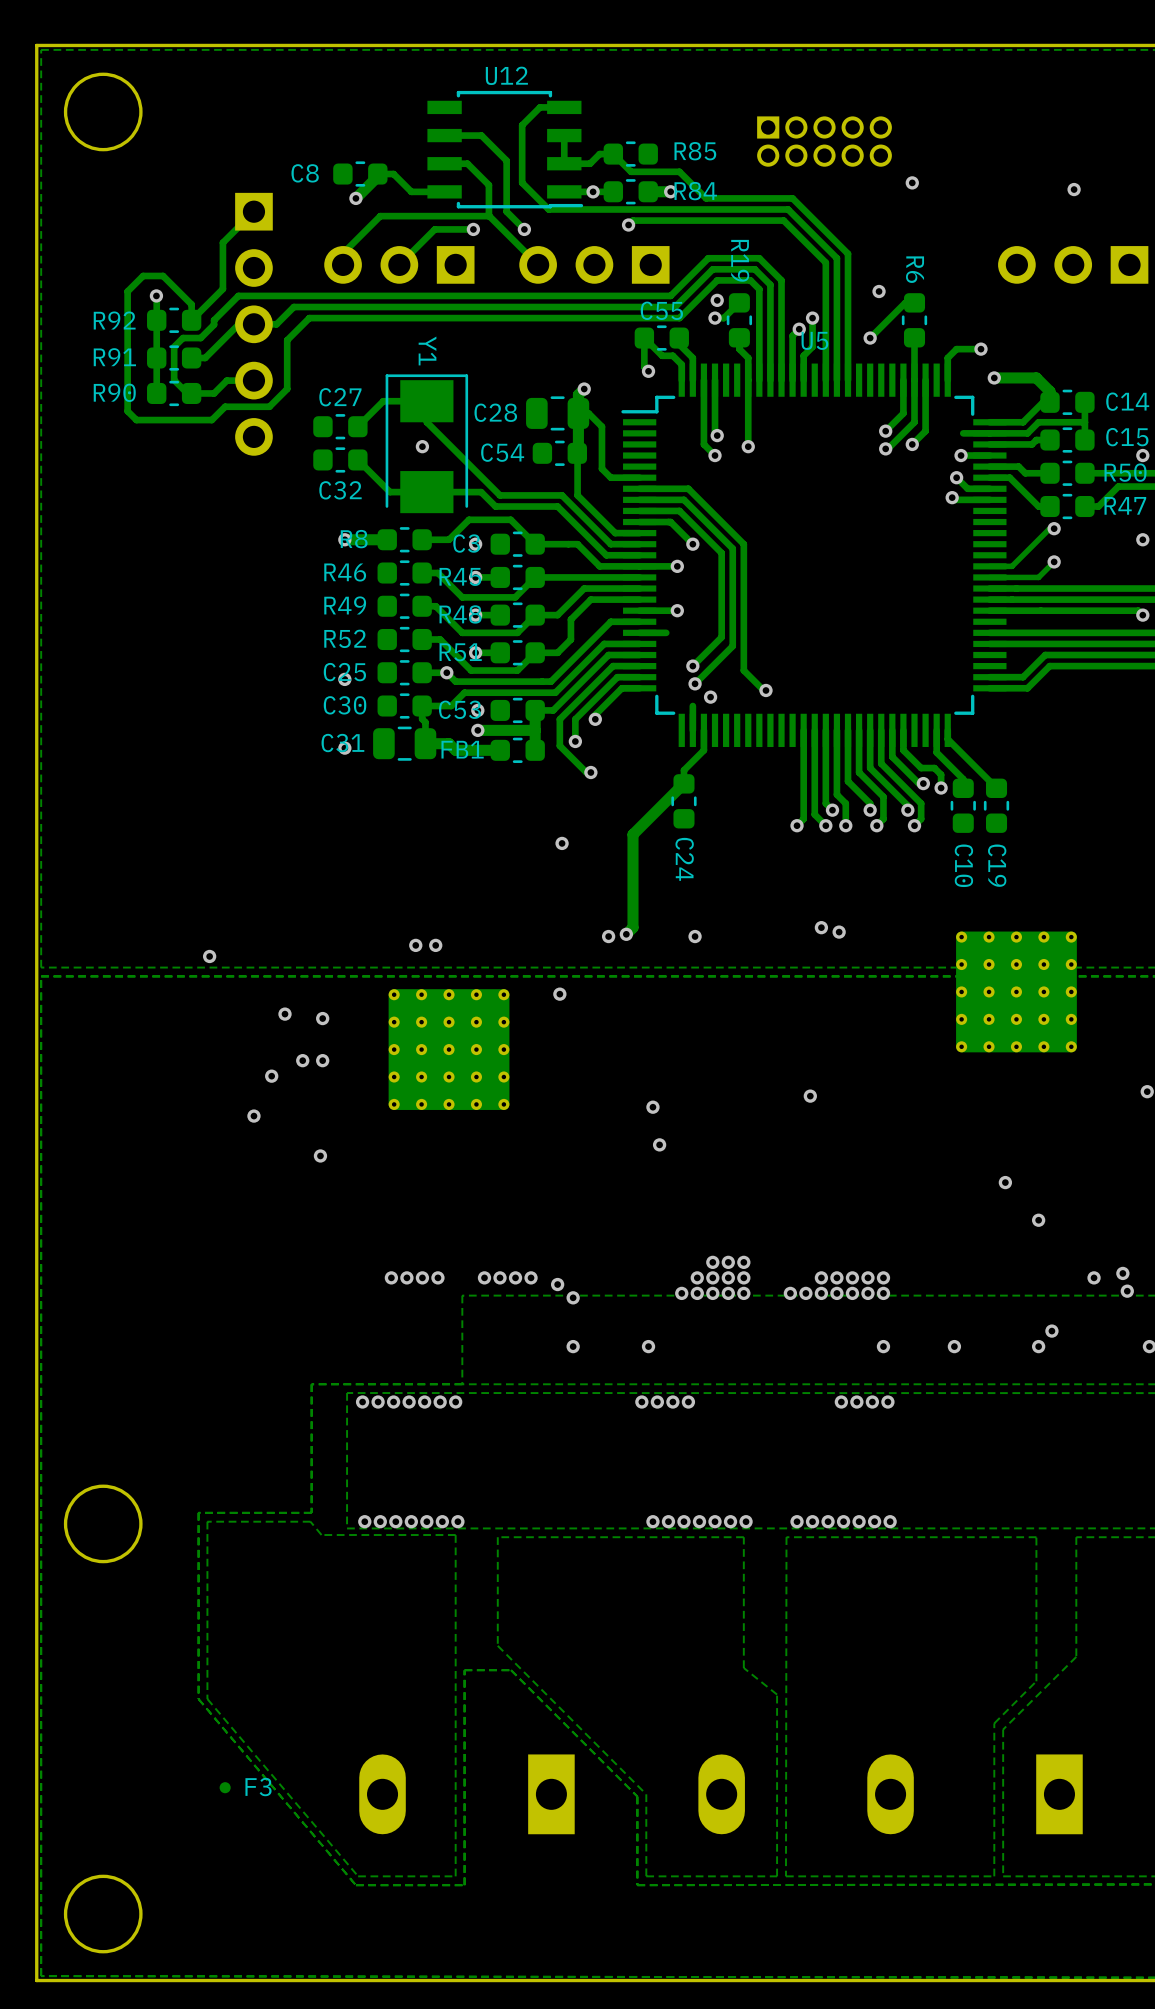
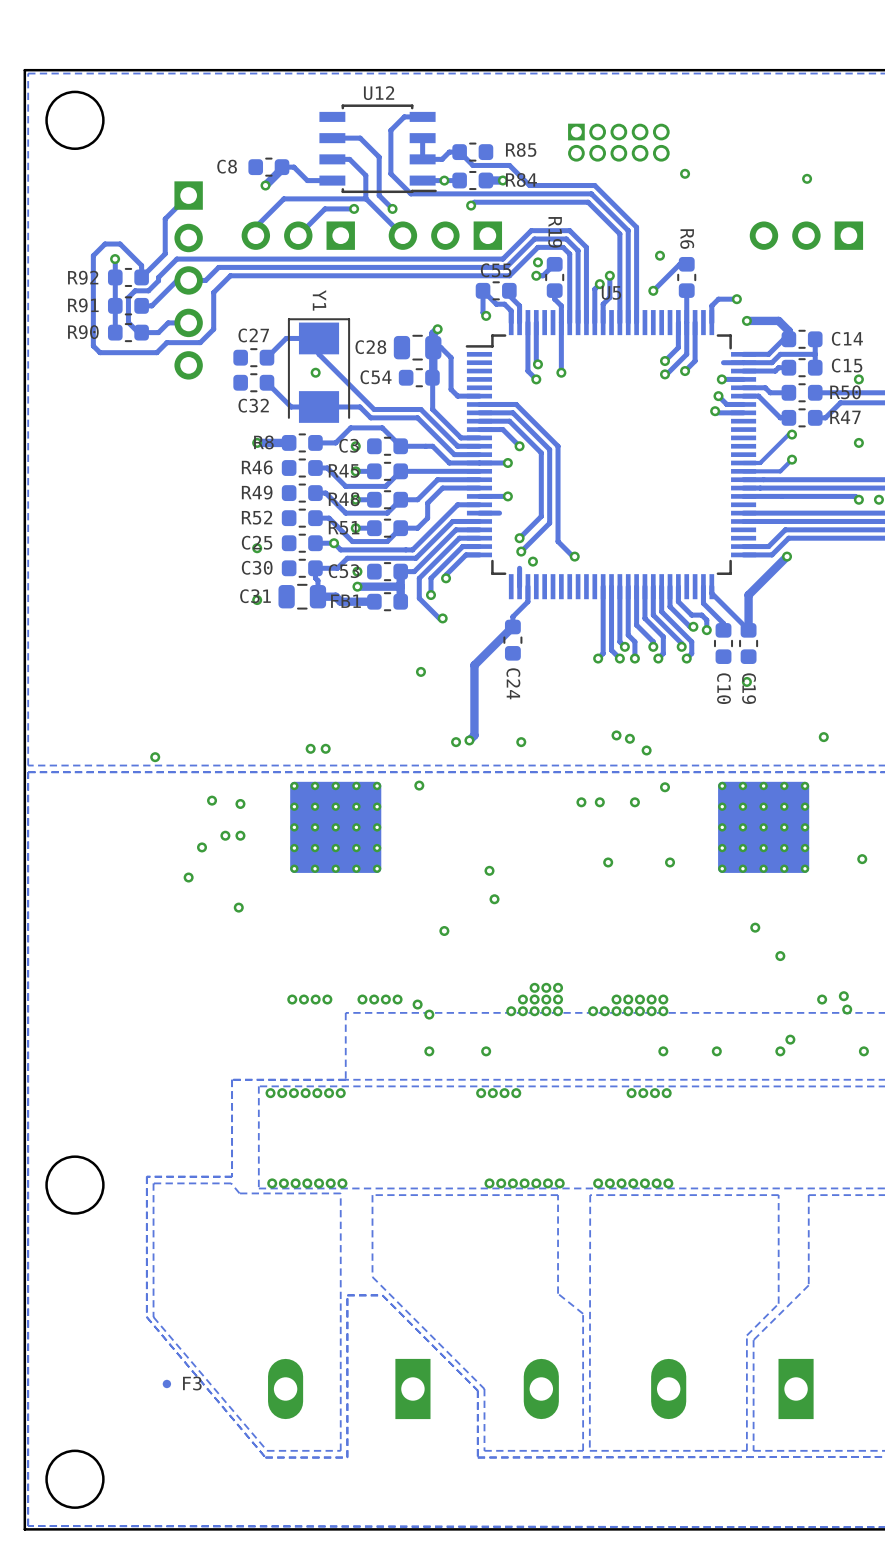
track: none -> (787, 556) (748, 595) (748, 630)
via: none -> (787, 556)
via: none -> (746, 681)
via: none -> (823, 737)
via: none -> (646, 750)
part position: (1016, 991) -> (763, 827)
via: none -> (665, 787)
via: none -> (581, 802)
via: none -> (599, 802)
via: none -> (634, 802)
via: none -> (670, 862)
via: none -> (444, 931)

